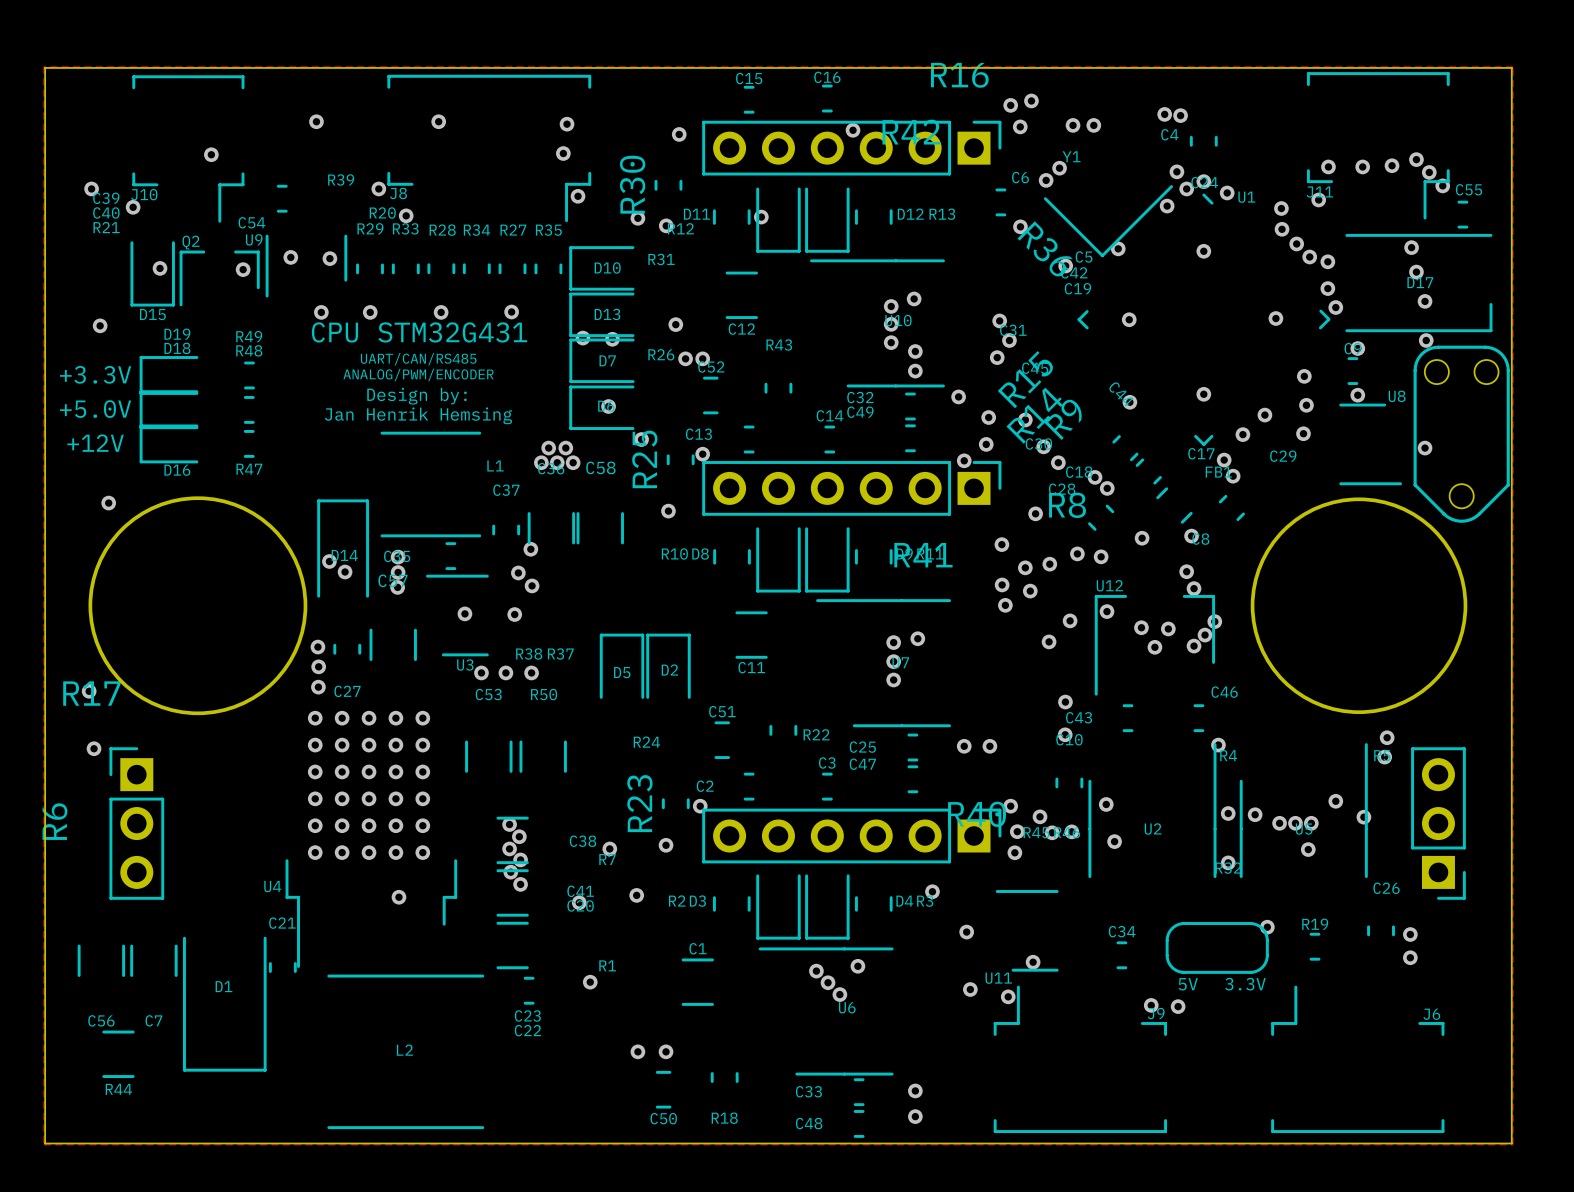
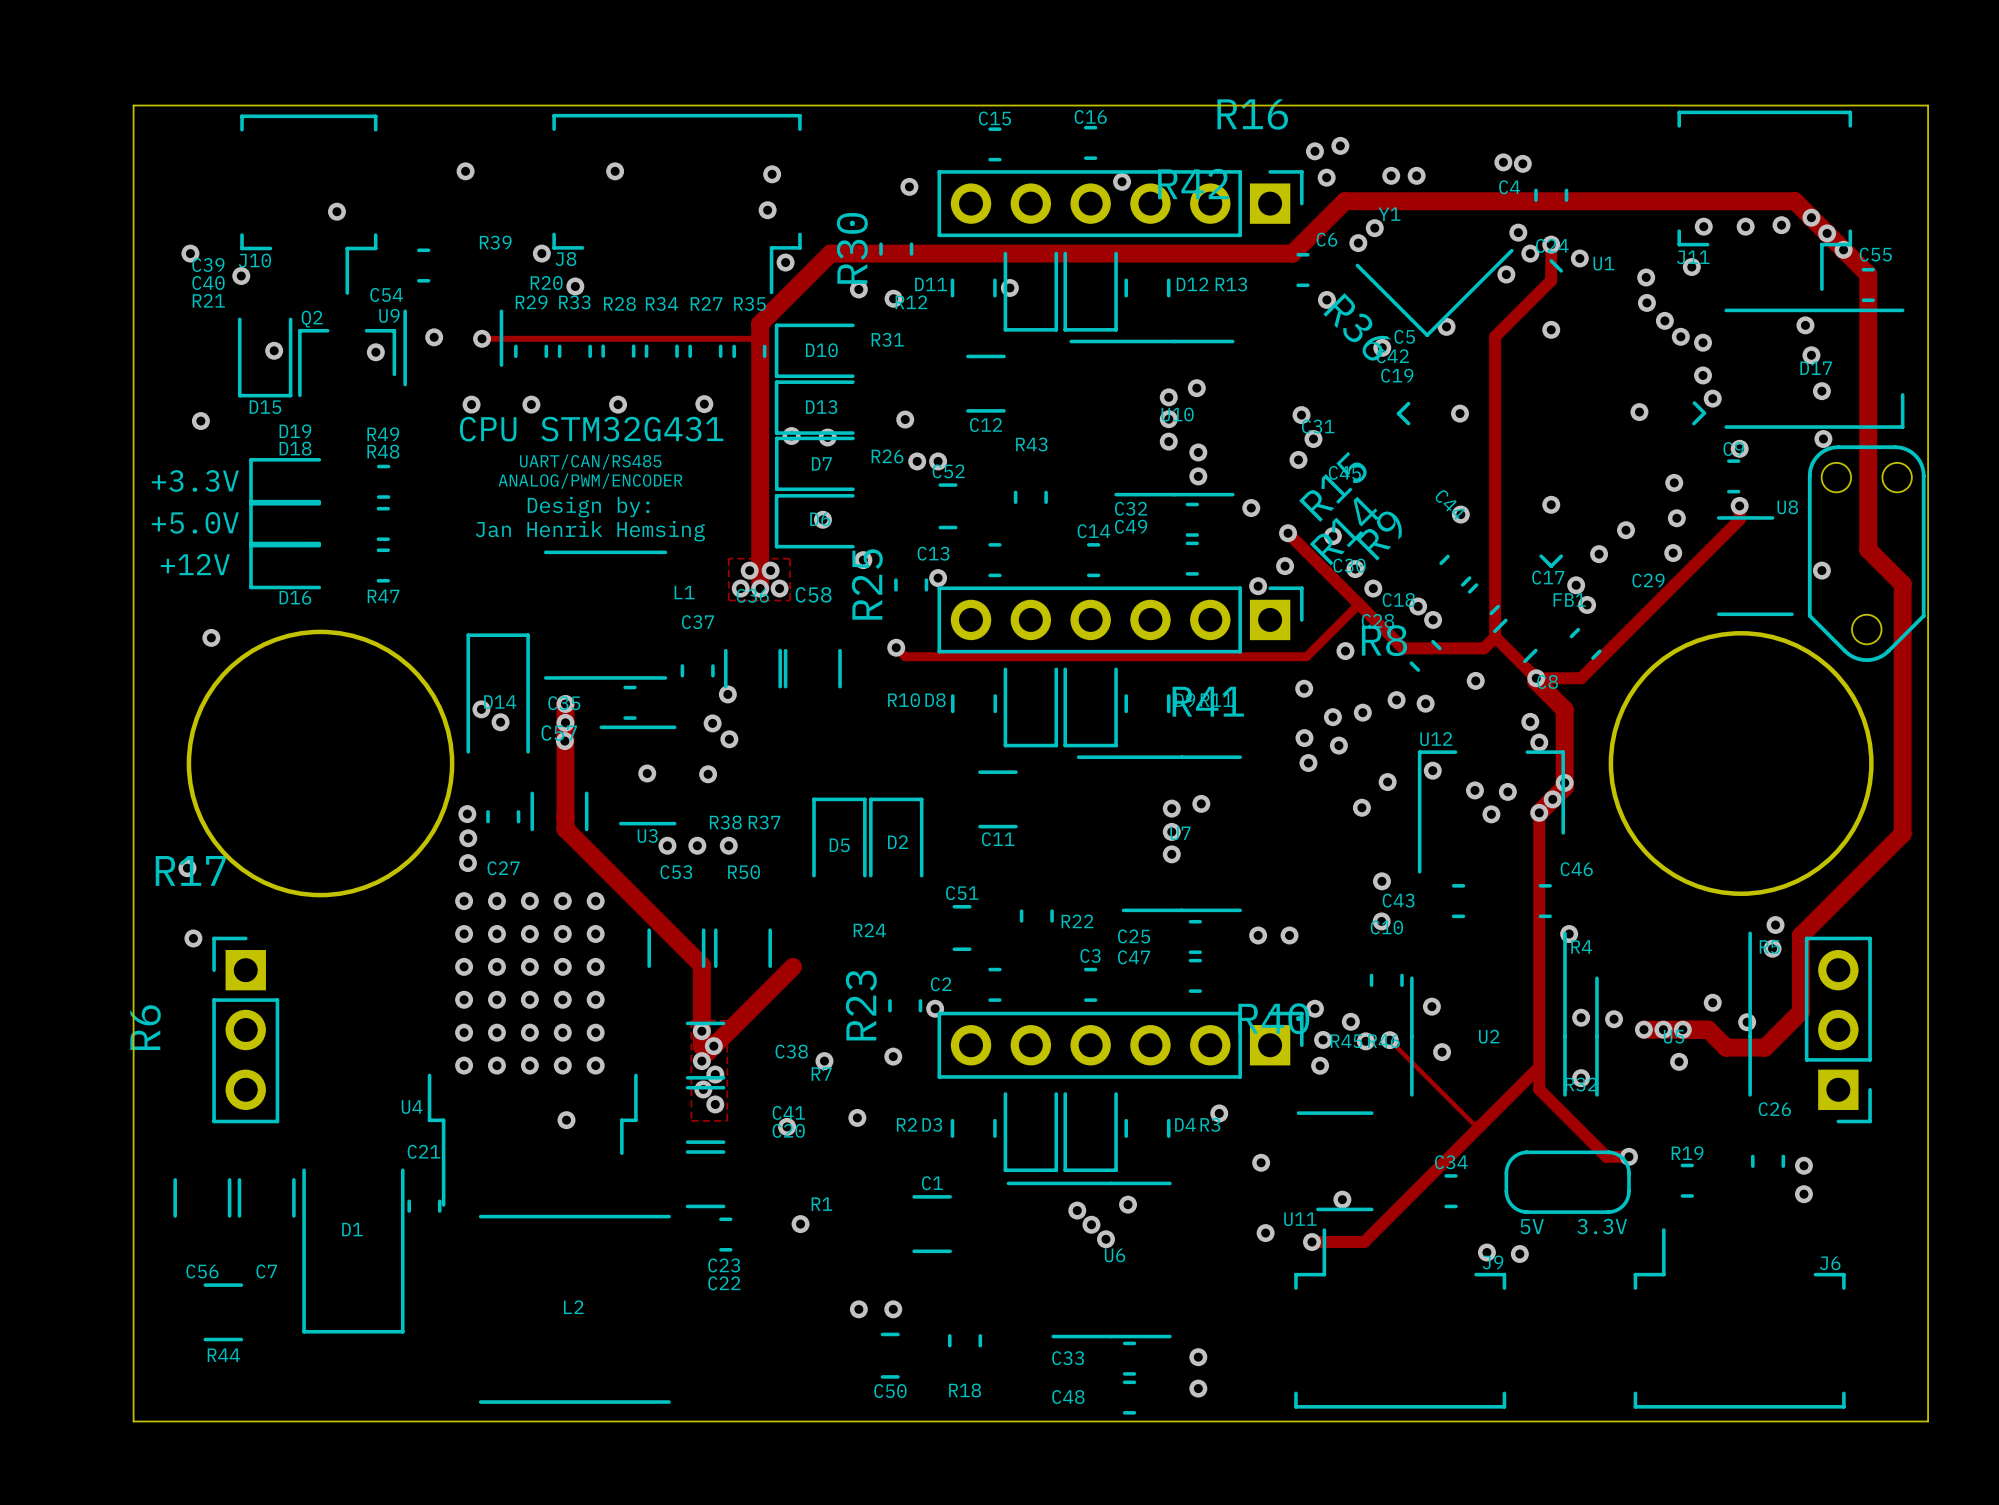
zone outline: (43, 66) (1513, 66) (1513, 1144) (43, 1144) (43, 66) -> none
track: none -> (1551, 244) (1551, 280) (1495, 336) (1495, 637)
track: none -> (482, 338) (757, 338) (760, 341)
track: none -> (1739, 505) (1739, 519) (1581, 678) (1536, 678)
track: none -> (1288, 533) (1403, 648) (1483, 648) (1495, 637)
zone outline: none -> (728, 558) (790, 558) (790, 600) (728, 600) (728, 558)
track: none -> (760, 588) (760, 323) (830, 253) (1292, 253) (1344, 201) (1794, 201) (1868, 274) (1868, 549) (1902, 584) (1902, 833) (1800, 935) (1800, 1011) (1765, 1047) (1726, 1047) (1708, 1029) (1643, 1029)
track: none -> (1359, 604) (1306, 656) (905, 656) (896, 647)
track: none -> (1495, 637) (1536, 678)
track: none -> (1536, 678) (1536, 681) (1564, 709) (1564, 787) (1539, 812) (1539, 1089) (1606, 1156) (1628, 1156)
track: none -> (565, 703) (565, 829) (701, 965) (701, 1046) (707, 1052) (793, 966)
zone outline: none -> (691, 1020) (727, 1020) (727, 1120) (691, 1120) (691, 1020)
track: none -> (1389, 1040) (1475, 1126) (1480, 1126)
track: none -> (1539, 1067) (1364, 1242) (1311, 1242)

